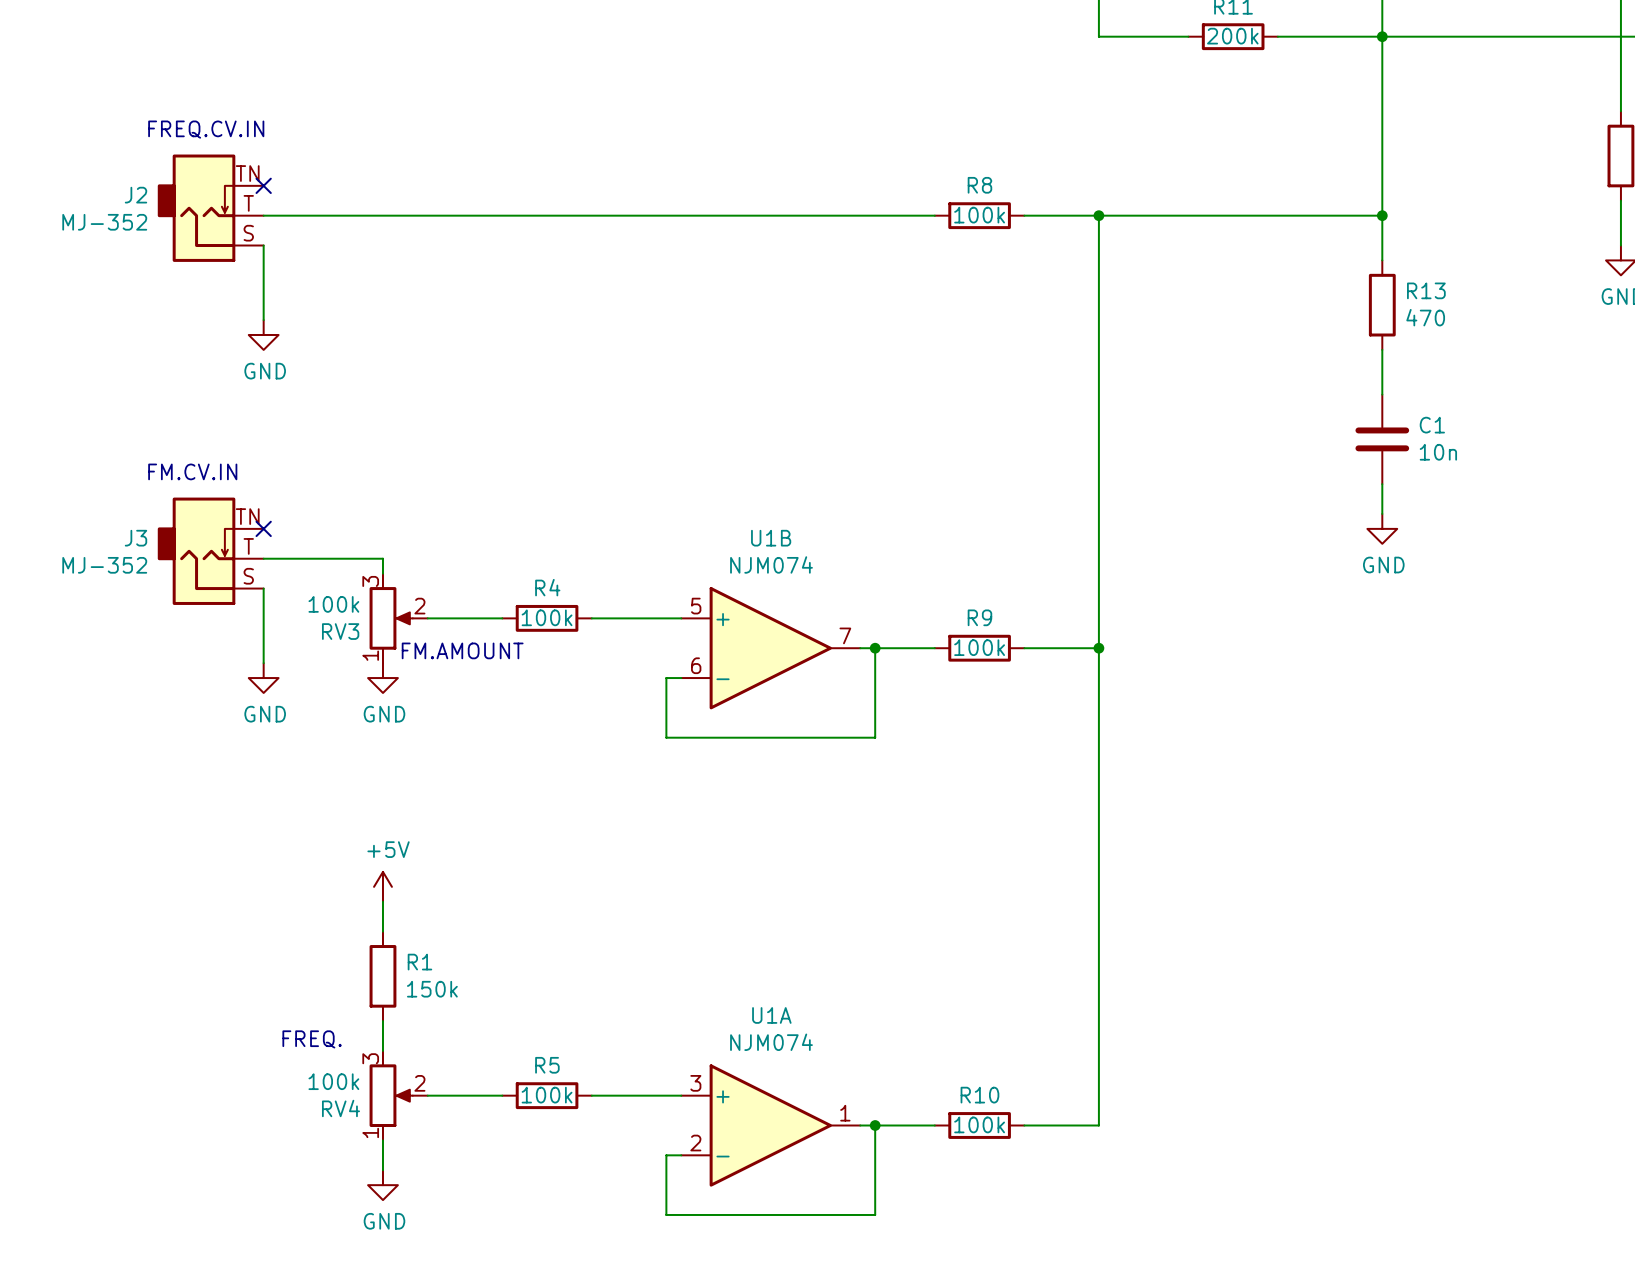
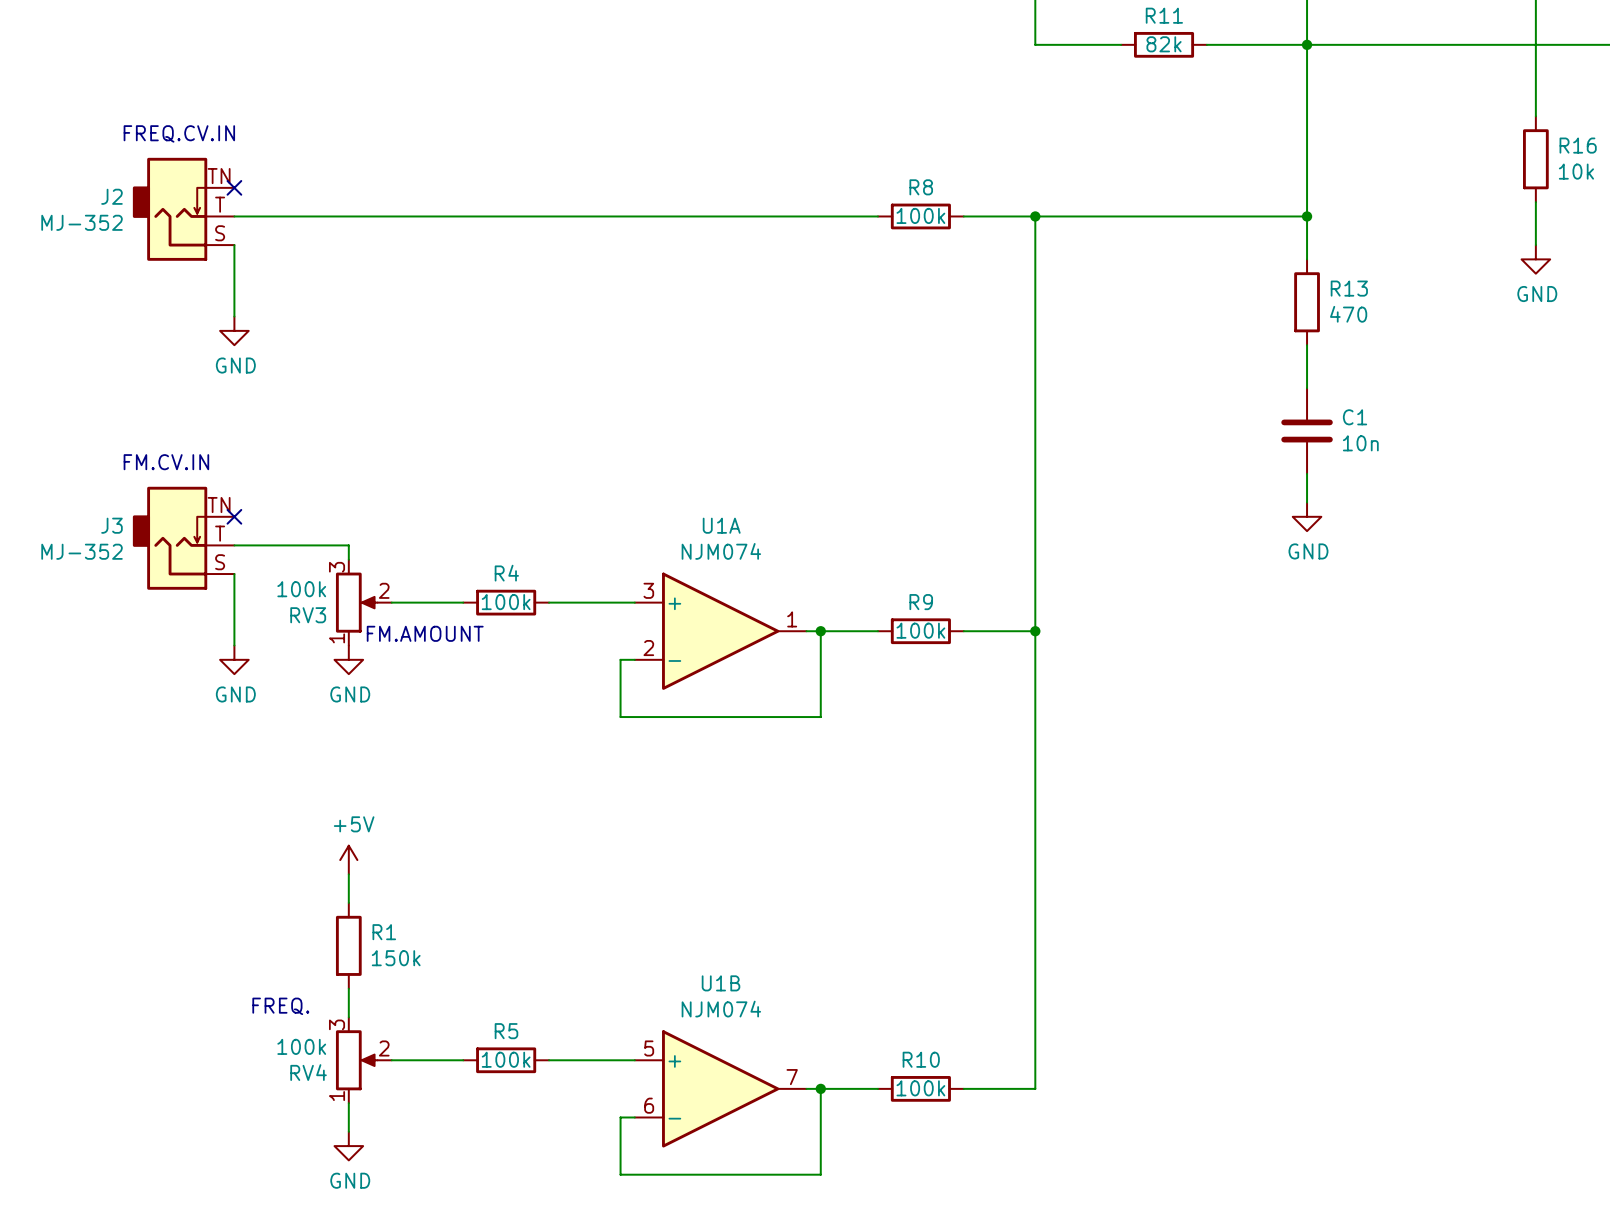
R11 value: 200k (1232, 36) -> 82k (1164, 44)
U1B position: (770, 648) -> (720, 1088)
U1A position: (770, 1125) -> (720, 631)

